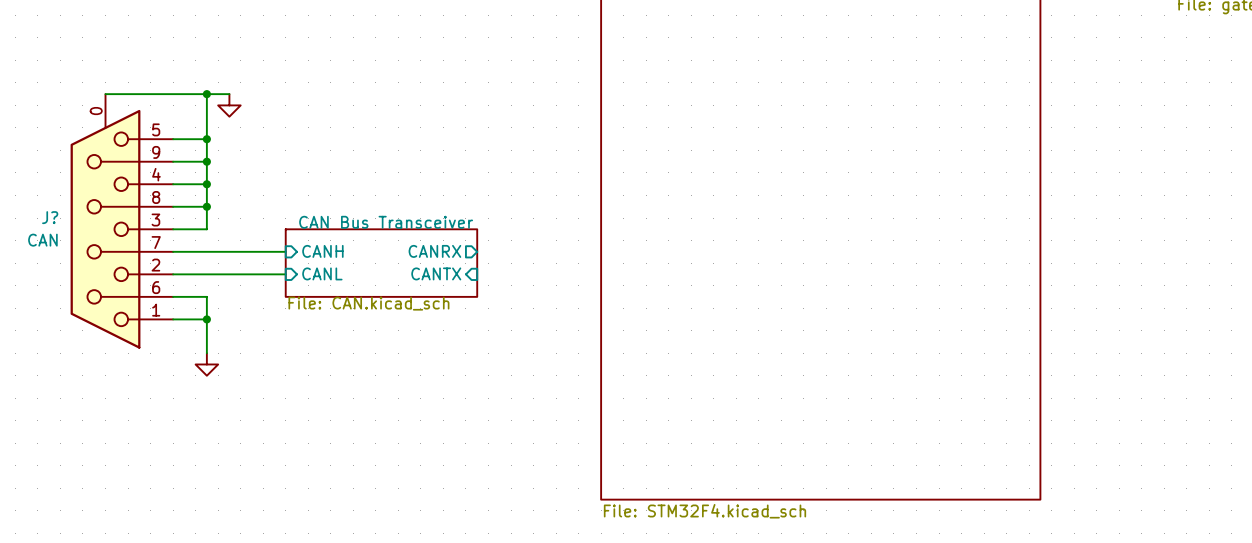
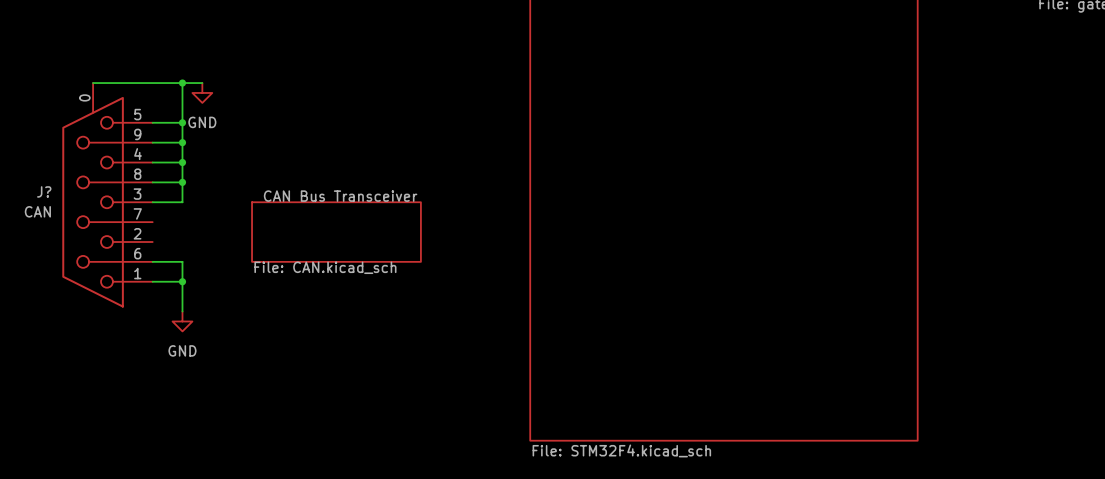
power symbol text: none -> GND (202, 122)
wire: (173, 251) (285, 251) -> none
sheet pin: CANH (322, 251) -> none
sheet pin: CANRX (434, 251) -> none
sheet pin: CANL (322, 273) -> none
sheet pin: CANTX (436, 273) -> none
wire: (173, 274) (285, 274) -> none
power symbol text: none -> GND (182, 350)

